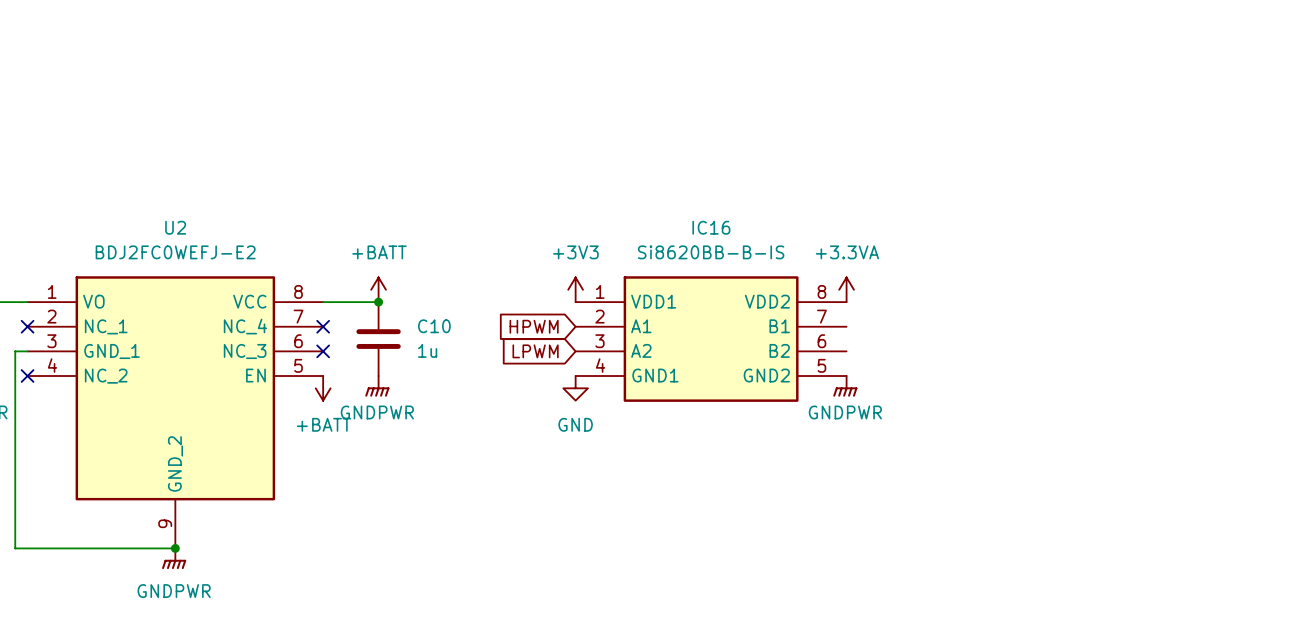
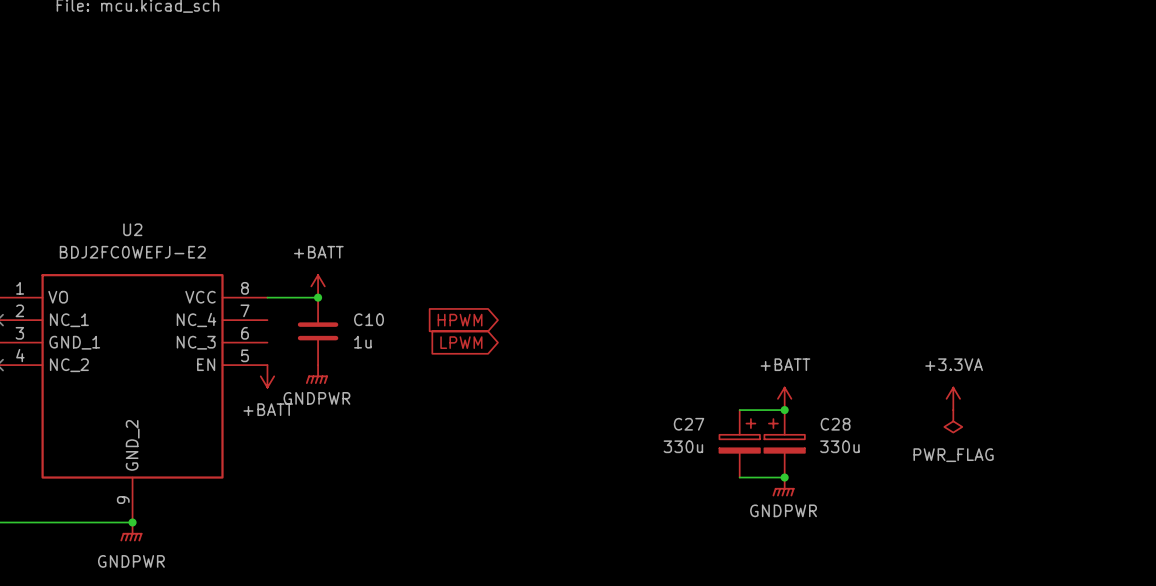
power symbol: +3V3 (575, 289) -> none
power symbol: +3.3VA (846, 289) -> none
no-connect mark: (323, 326) -> none
IC16: Si8620BB-B-IS (711, 339) -> none
no-connect mark: (323, 351) -> none
power symbol position: GNDPWR (845, 386) -> GNDPWR (783, 486)
power symbol: GND (575, 388) -> none
power symbol: none -> +BATT (784, 398)
power symbol: none -> +3.3VA (953, 398)
wire: none -> (739, 410) (784, 410)
junction: none -> (784, 410)
power symbol: none -> PWR_FLAG (953, 421)
C27: none -> 330u (739, 443)
C28: none -> 330u (784, 443)
wire: none -> (739, 477) (784, 477)
junction: none -> (784, 477)

